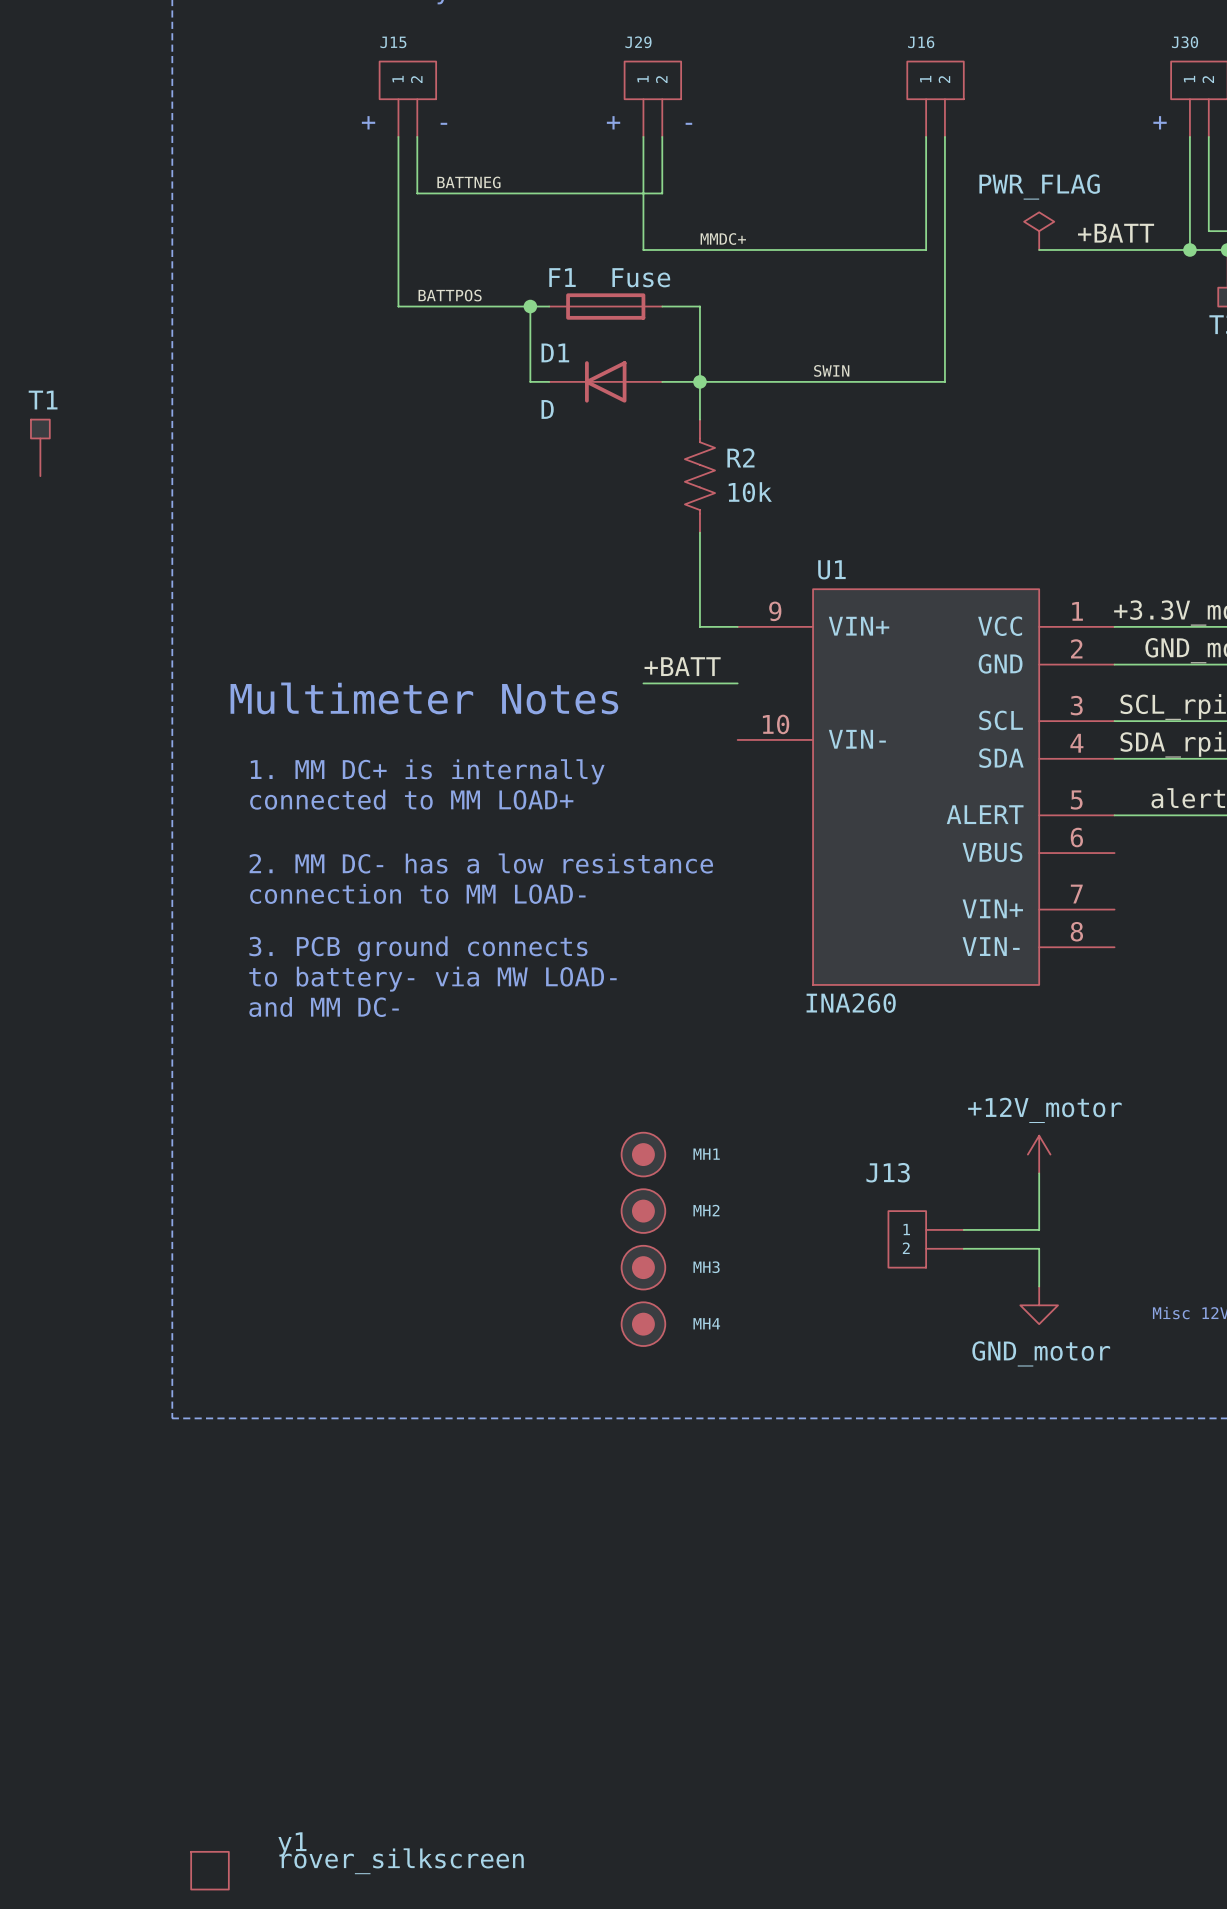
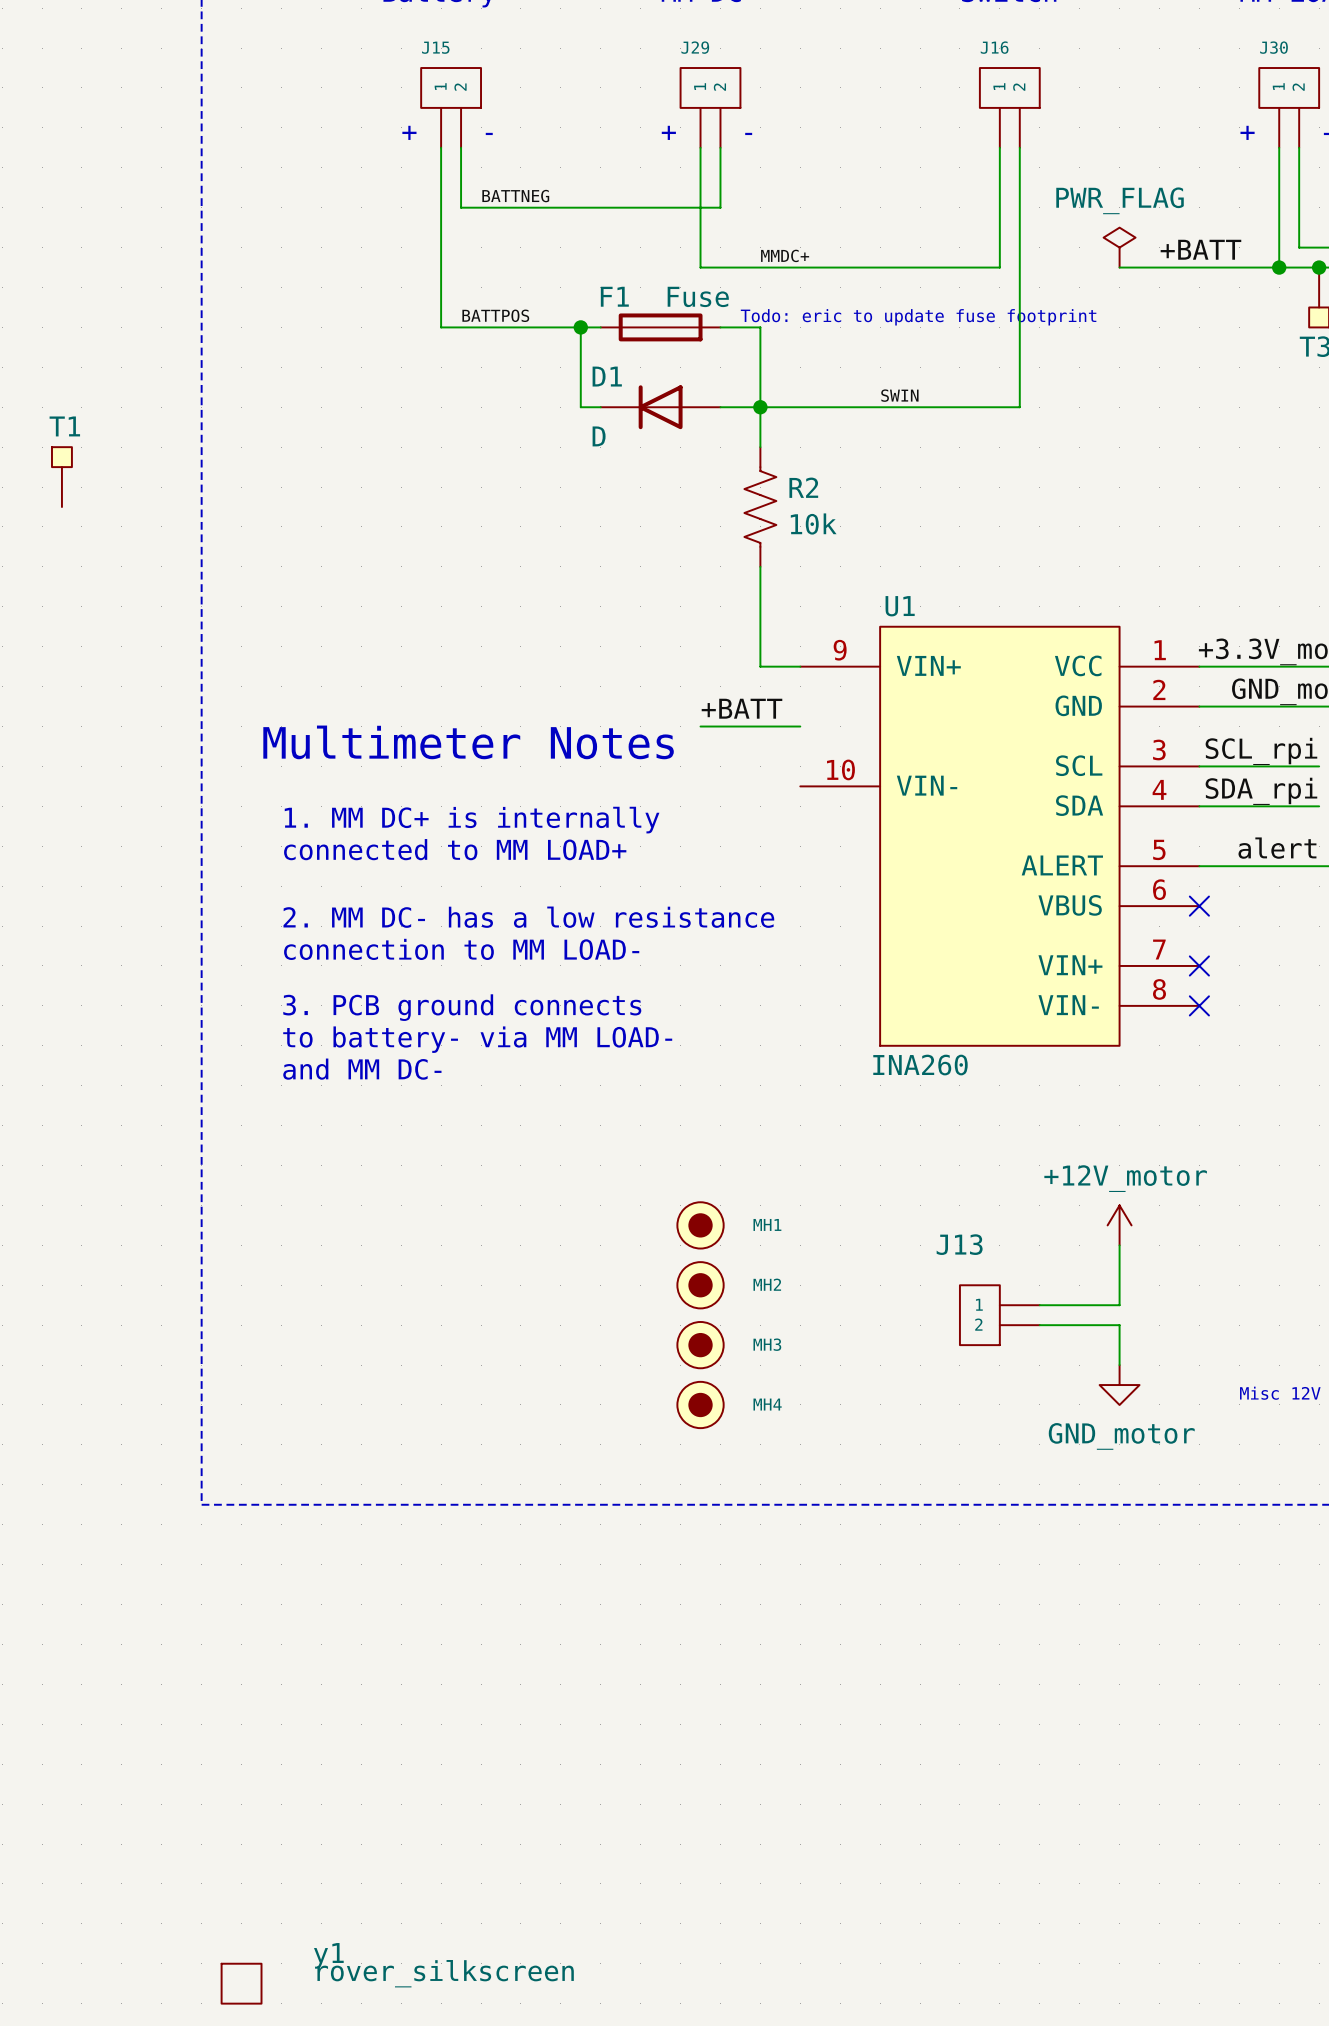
text: none -> Todo: eric to update fuse footprint (918, 317)
no-connect mark: none -> (1199, 906)
no-connect mark: none -> (1199, 965)
no-connect mark: none -> (1199, 1005)
text: to battery- via MW LOAD- (433, 979) -> to battery- via MM LOAD- (477, 1039)

